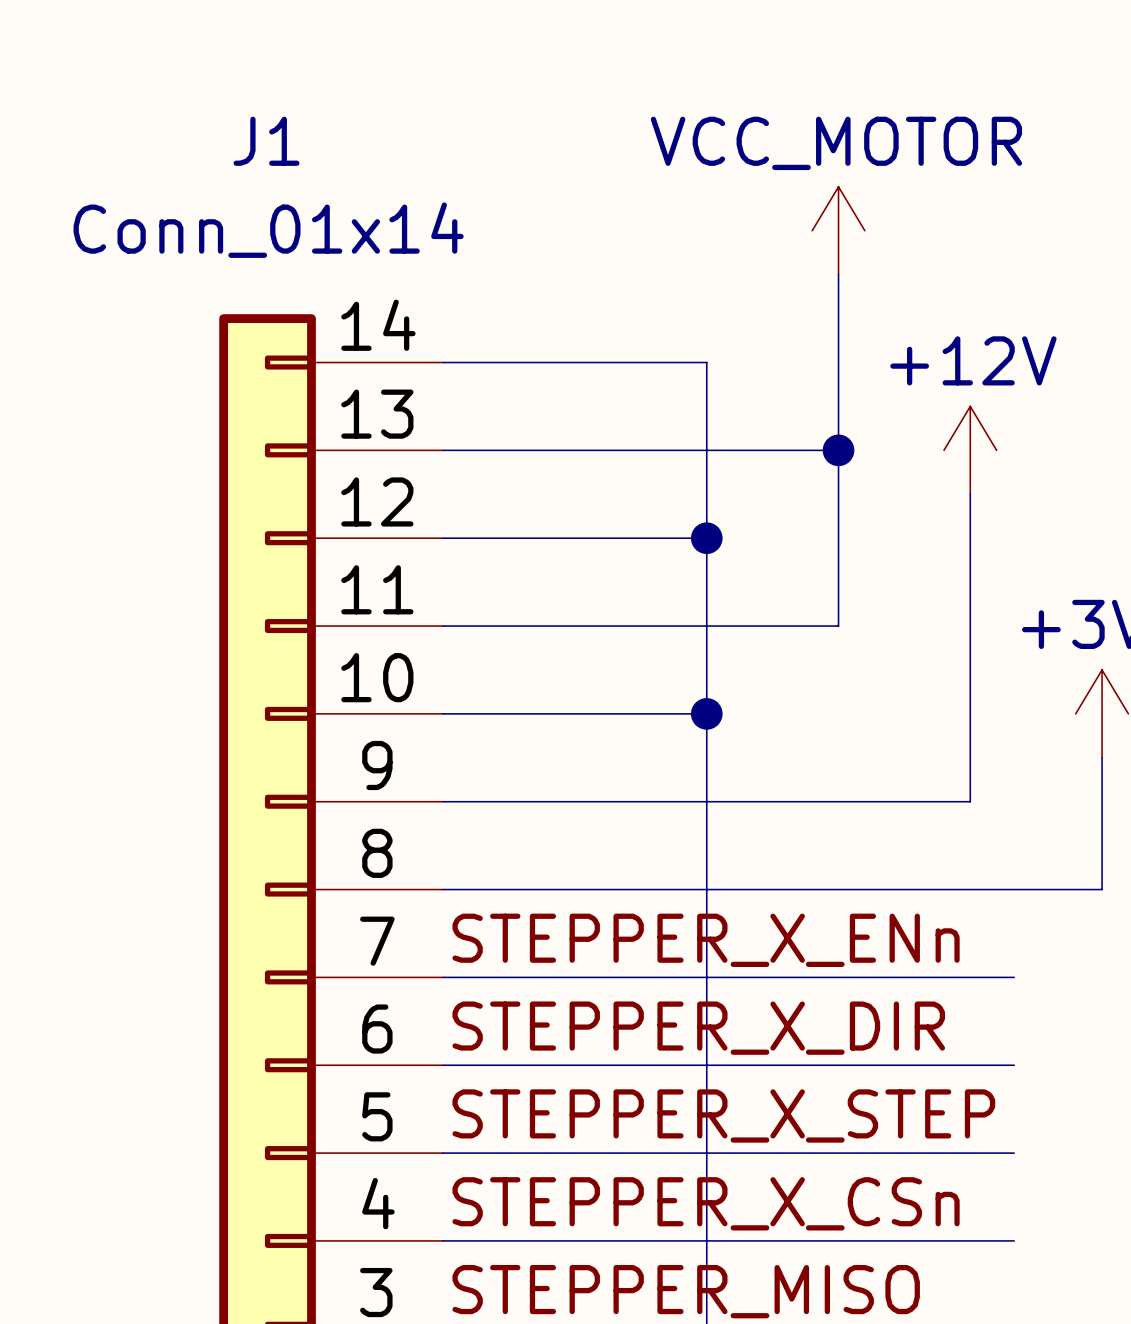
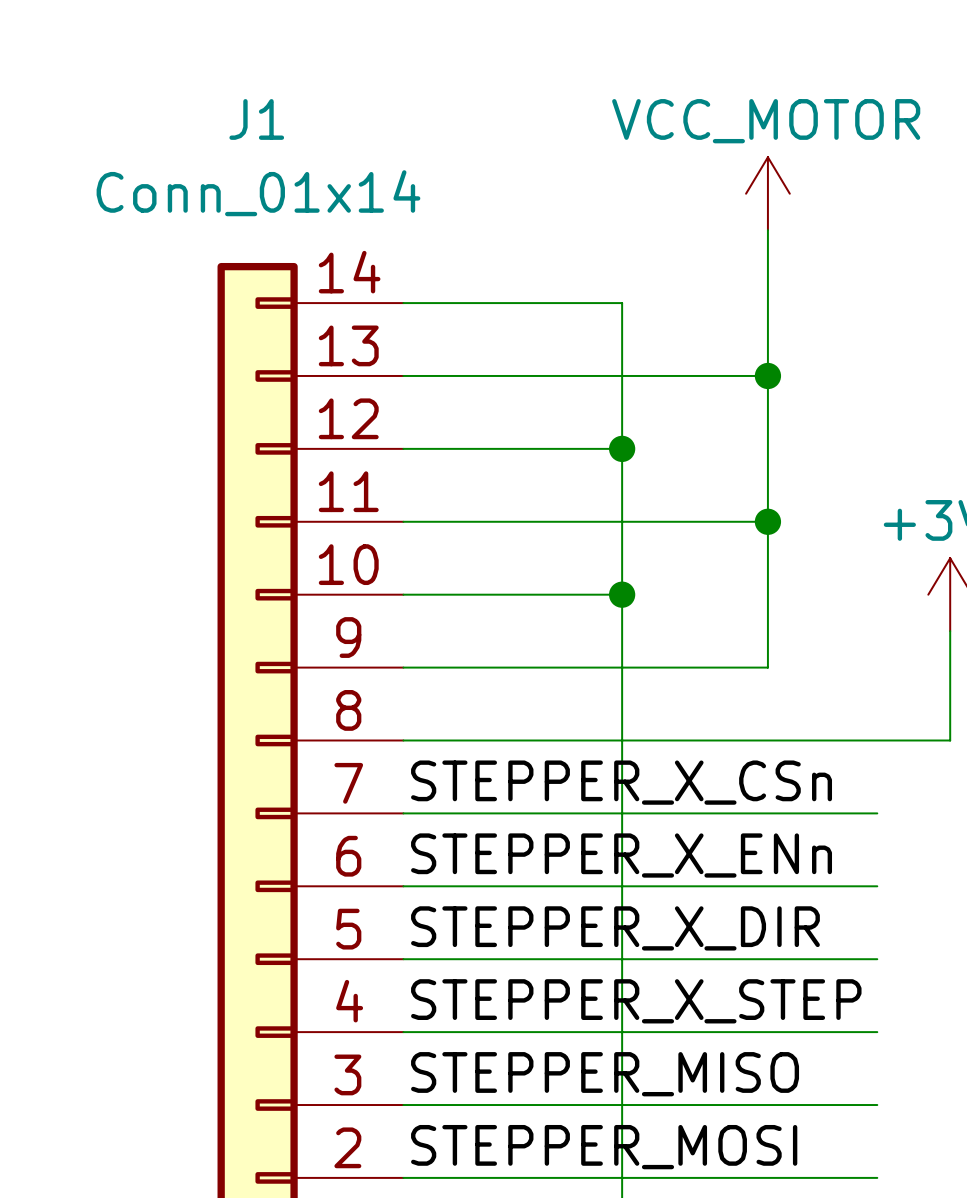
power symbol position: VCC_MOTOR (838, 230) -> VCC_MOTOR (767, 193)
wire: (838, 274) (838, 626) -> (767, 521) (731, 521)
wire: none -> (731, 375) (767, 375)
junction position: (838, 450) -> (767, 375)
power symbol: +12V (970, 450) -> none
wire: (970, 494) (970, 801) (882, 801) -> (767, 230) (767, 667)
junction: none -> (767, 521)
label: STEPPER_X_ENn (706, 940) -> STEPPER_X_CSn (621, 782)
label: STEPPER_X_DIR (698, 1028) -> STEPPER_X_ENn (621, 855)
label: STEPPER_X_STEP (723, 1115) -> STEPPER_X_DIR (615, 928)
label: STEPPER_X_CSn (706, 1203) -> STEPPER_X_STEP (636, 1001)

